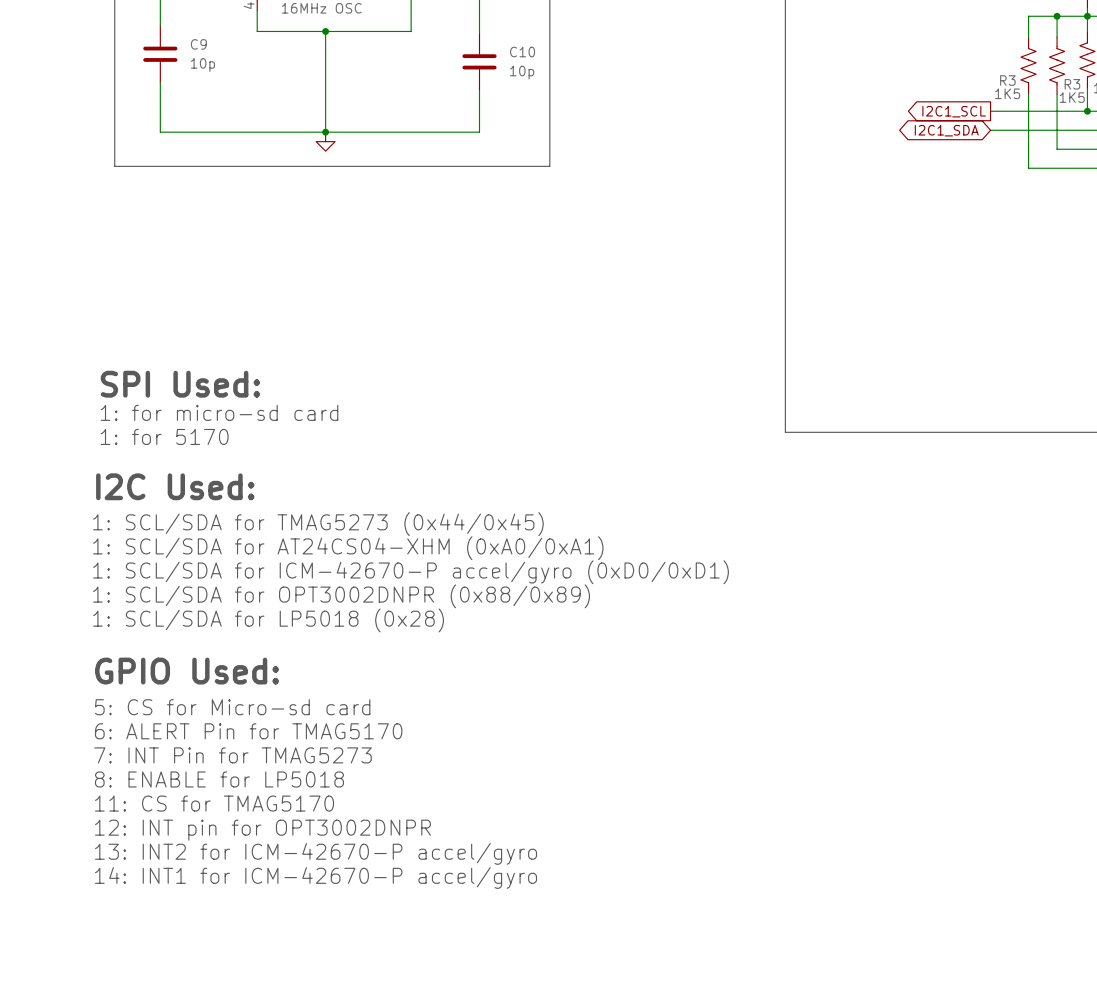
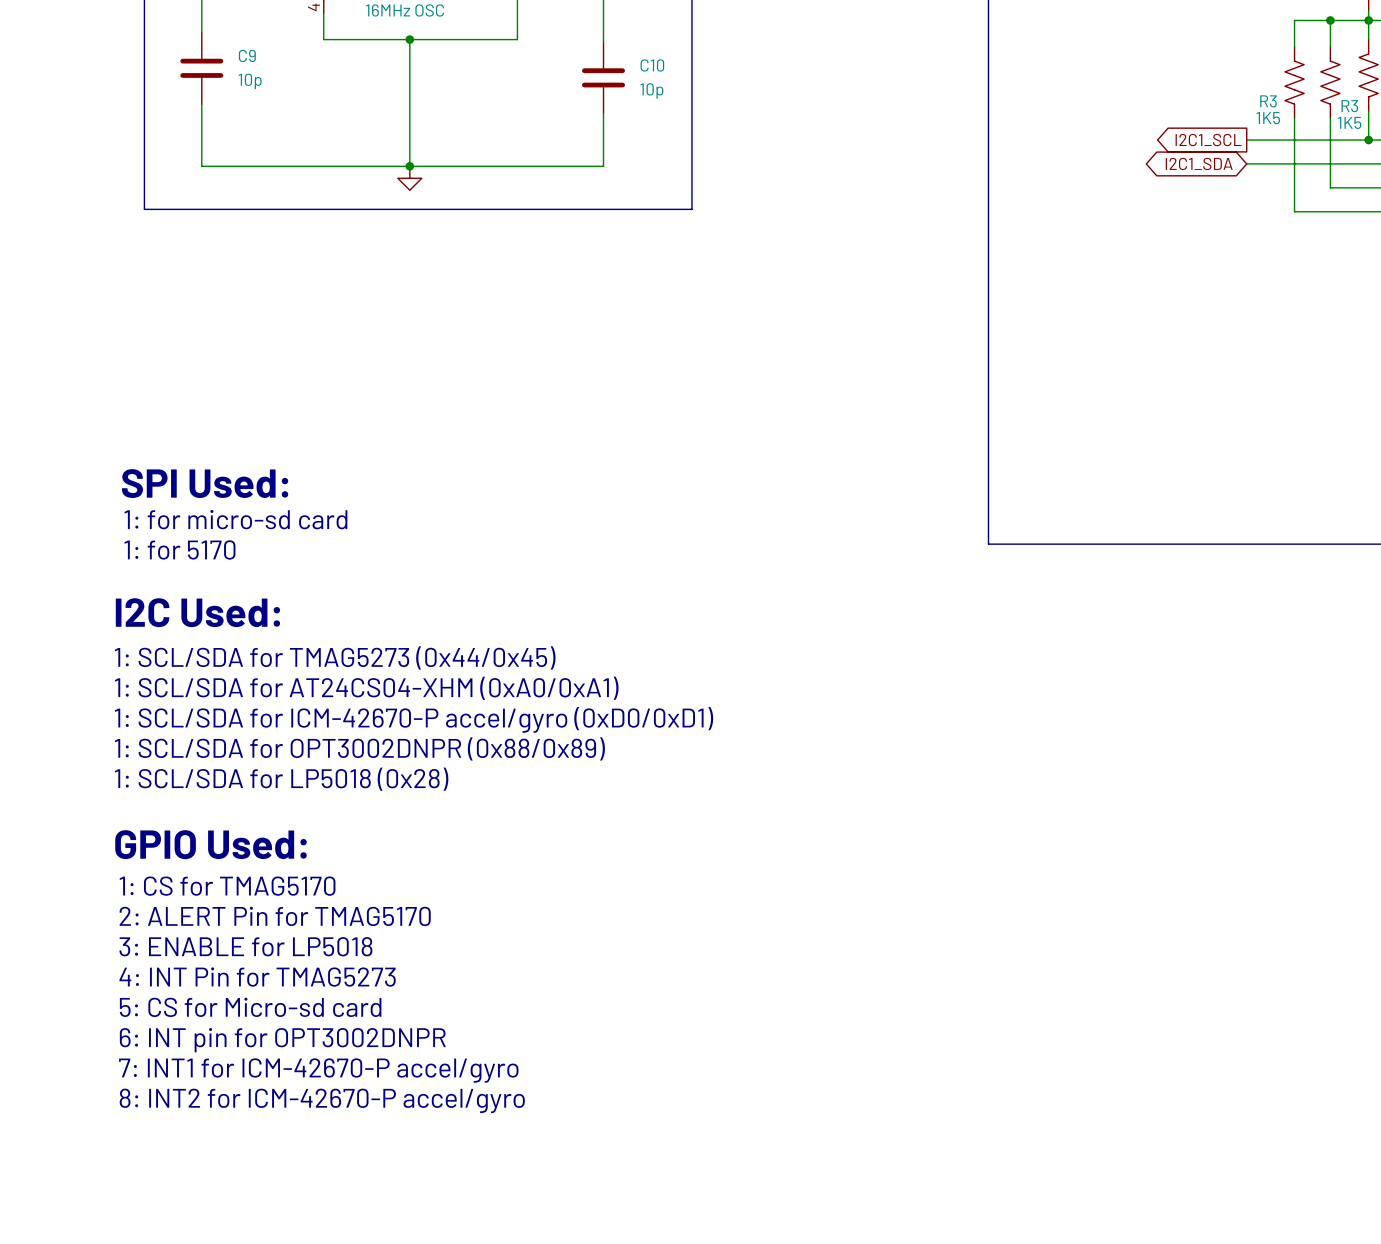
text: 5: CS for Micro-sd card (232, 707) -> 1: CS for TMAG5170 (227, 886)
text: 6: ALERT Pin for TMAG5170 (248, 731) -> 2: ALERT Pin for TMAG5170 (275, 916)
text: 7: INT Pin for TMAG5273 (233, 755) -> 3: ENABLE for LP5018 (245, 946)
text: 8: ENABLE for LP5018 (219, 779) -> 4: INT Pin for TMAG5273 (257, 977)
text: 11: CS for TMAG5170 (214, 803) -> 5: CS for Micro-sd card (250, 1007)
text: 12: INT pin for OPT3002DNPR (262, 830) -> 6: INT pin for OPT3002DNPR (282, 1040)
text: 13: INT2 for ICM-42670-P accel/gyro (316, 853) -> 7: INT1 for ICM-42670-P accel/gyro (318, 1070)
text: 14: INT1 for ICM-42670-P accel/gyro (316, 877) -> 8: INT2 for ICM-42670-P accel/gyro (322, 1100)

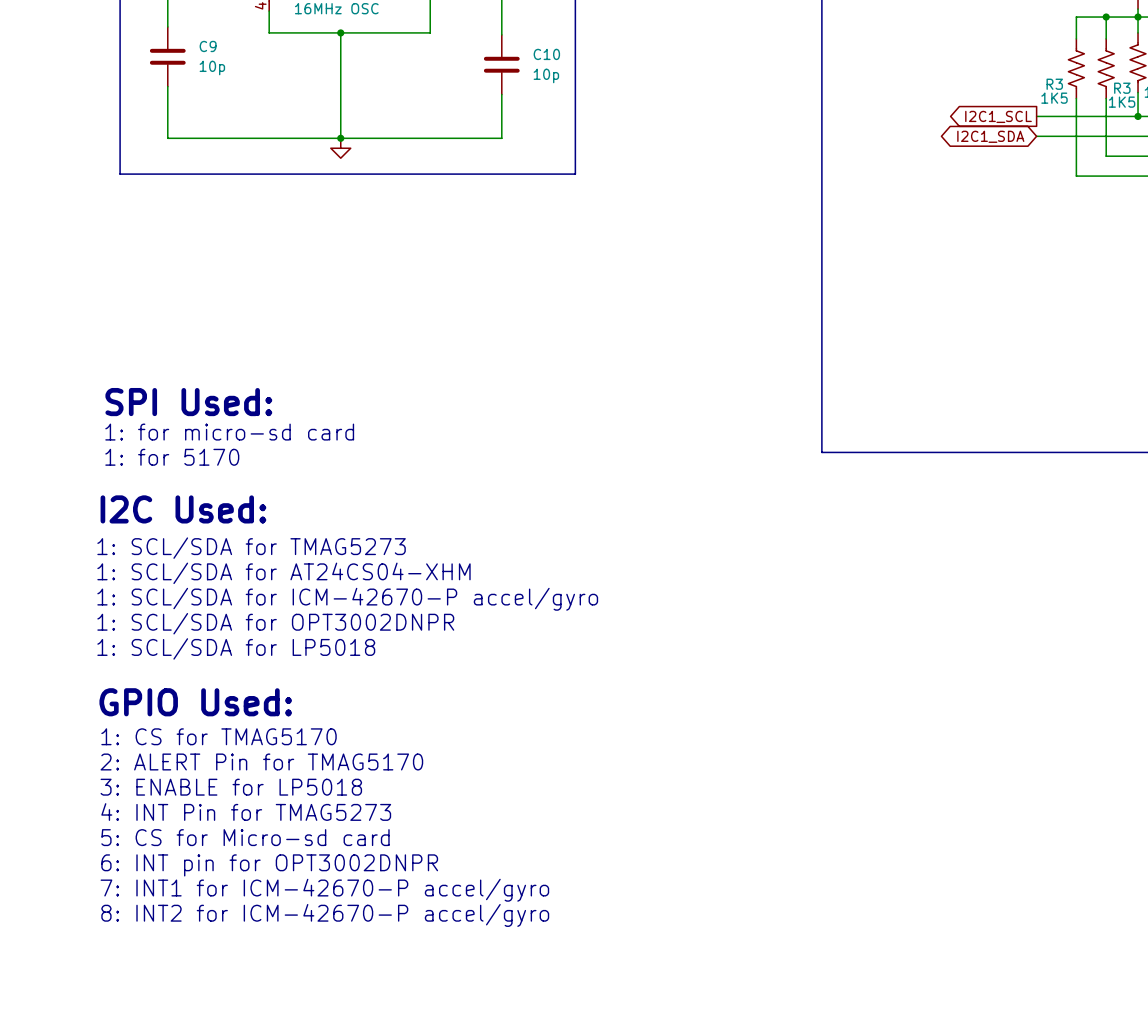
text: 1: SCL/SDA for TMAG5273 (0x44/0x45) (335, 657) -> 1: SCL/SDA for TMAG5273 (251, 548)
text: 1: SCL/SDA for AT24CS04-XHM (0xA0/0xA1) (366, 688) -> 1: SCL/SDA for AT24CS04-XHM (283, 573)
text: 1: SCL/SDA for ICM-42670-P accel/gyro (0xD0/0xD1) (414, 719) -> 1: SCL/SDA for ICM-42670-P accel/gyro (347, 599)
text: 1: SCL/SDA for OPT3002DNPR (0x88/0x89) (359, 748) -> 1: SCL/SDA for OPT3002DNPR (275, 623)
text: 1: SCL/SDA for LP5018 (0x28) (281, 779) -> 1: SCL/SDA for LP5018 (236, 648)

